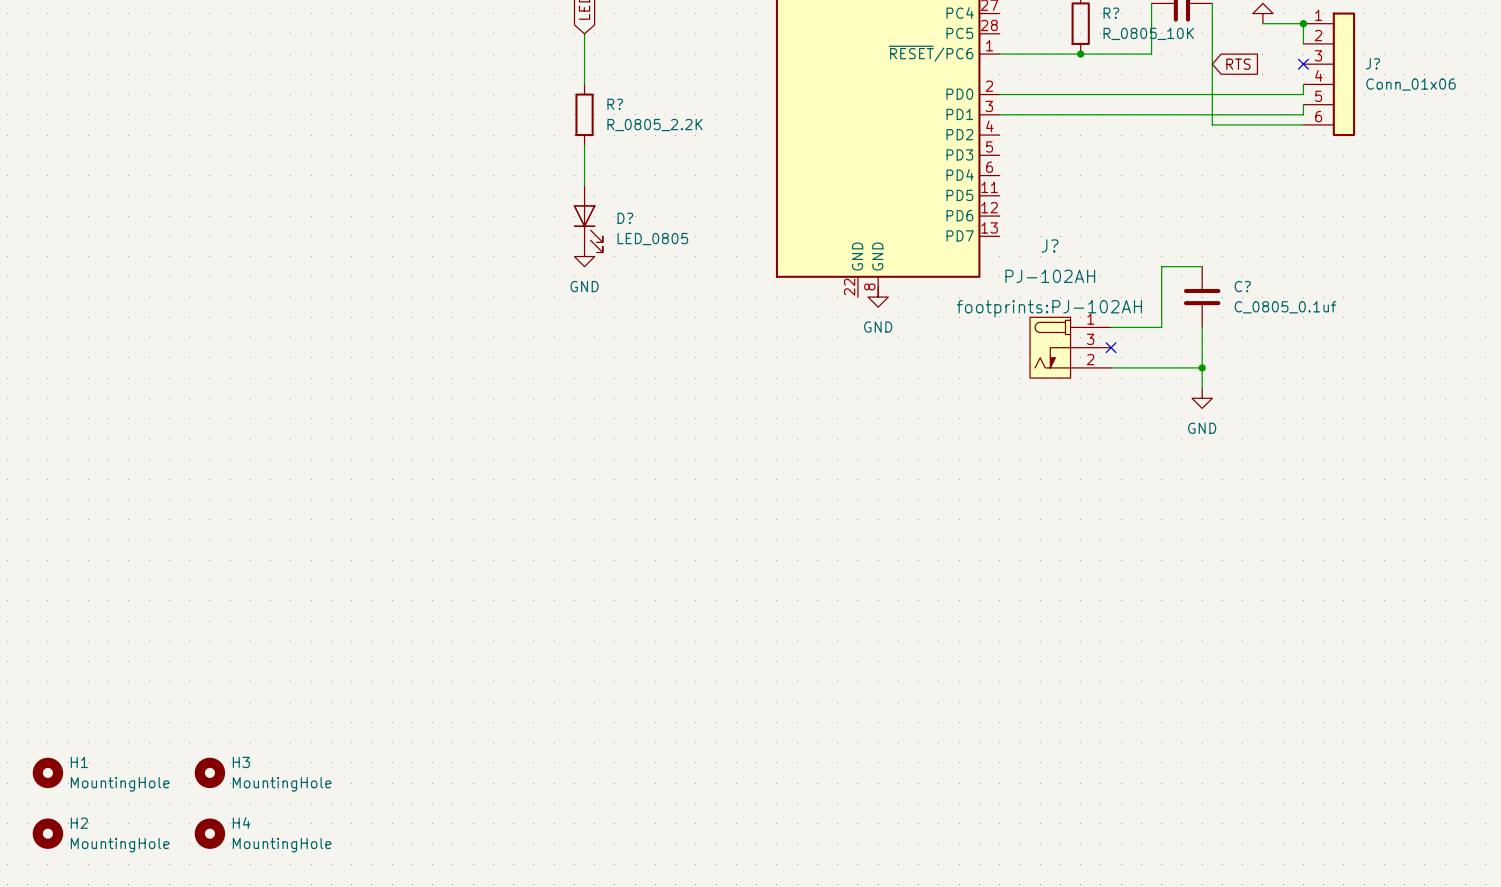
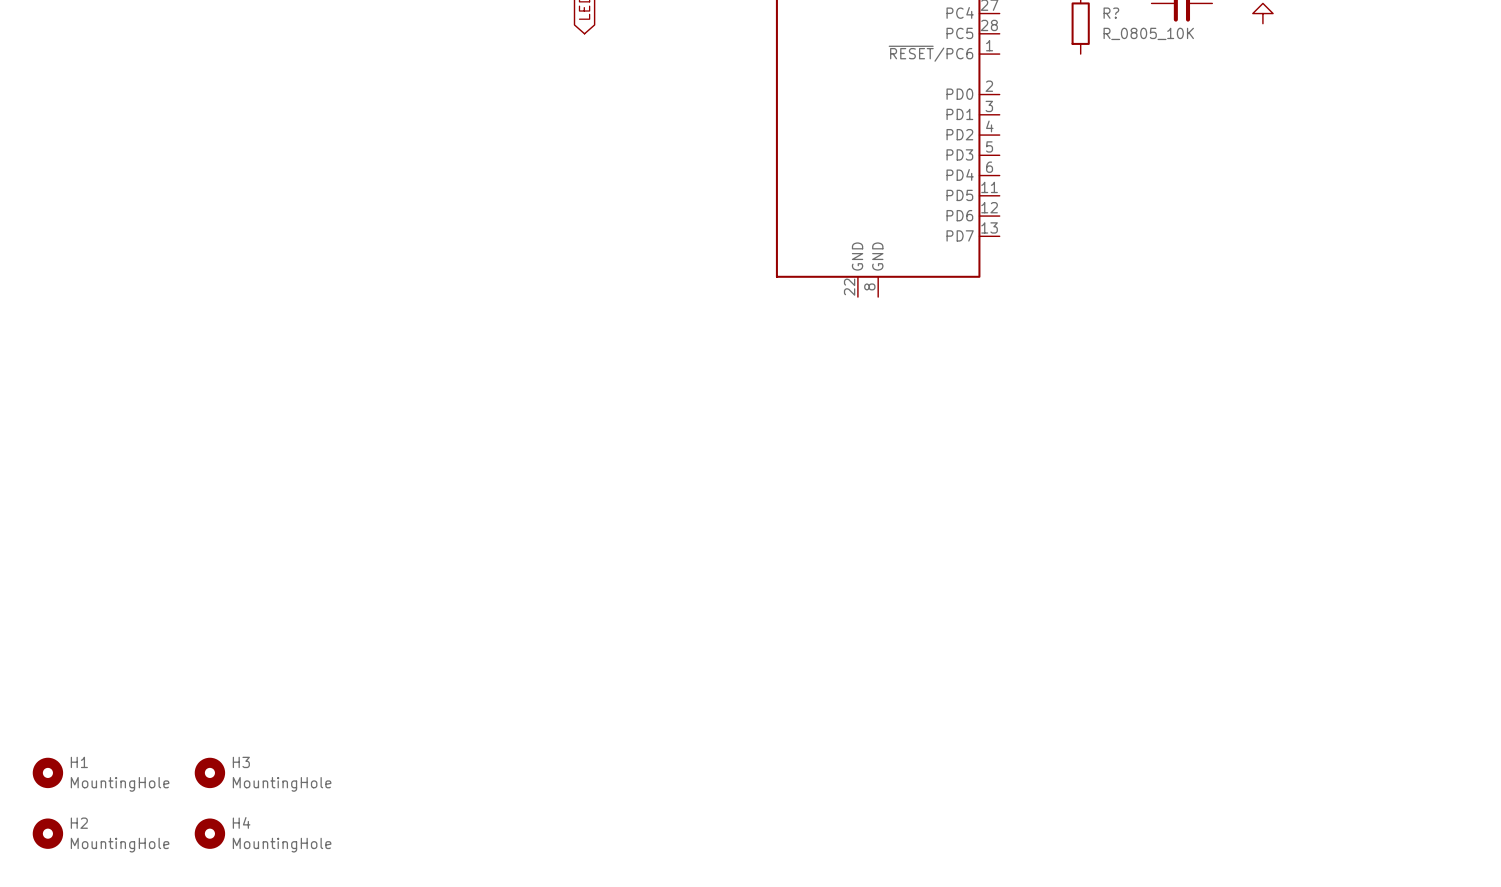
wire: (1151, 3) (1151, 54) (999, 54) -> none
wire: (1212, 3) (1212, 124) (1303, 124) -> none
wire: (1262, 23) (1303, 23) (1303, 43) -> none
junction: (1303, 23) -> none
wire: (584, 33) (584, 84) -> none
junction: (1080, 54) -> none
global label: RTS (1238, 64) -> none
no-connect mark: (1303, 64) -> none
J?: Conn_01x06 (1329, 74) -> none
wire: (1303, 84) (1303, 94) (999, 94) -> none
wire: (1303, 104) (1303, 114) (999, 114) -> none
R?: R_0805_2.2K (584, 114) -> none
wire: (584, 145) (584, 185) -> none
D?: LED_0805 (588, 219) -> none
power symbol: GND (584, 256) -> none
wire: (1202, 266) (1161, 266) (1161, 327) (1111, 327) -> none
power symbol: GND (878, 297) -> none
C?: C_0805_0.1uf (1202, 297) -> none
wire: (1202, 327) (1202, 388) -> none
J?: PJ-102AH (1070, 347) -> none
no-connect mark: (1111, 347) -> none
wire: (1111, 367) (1202, 367) -> none
junction: (1202, 367) -> none
power symbol: GND (1202, 398) -> none

